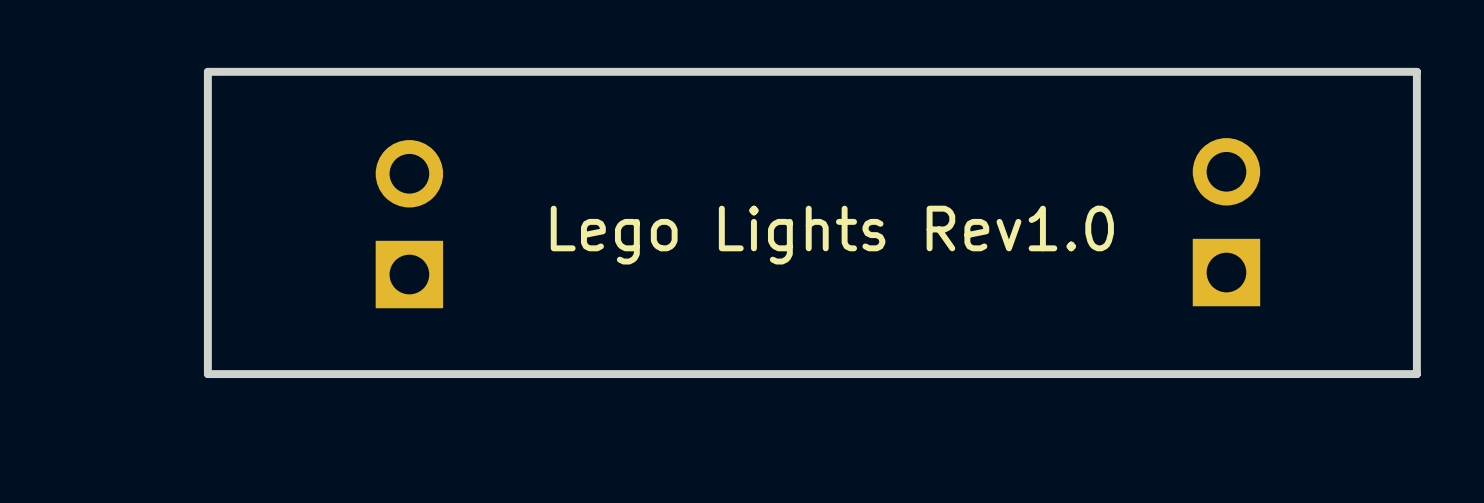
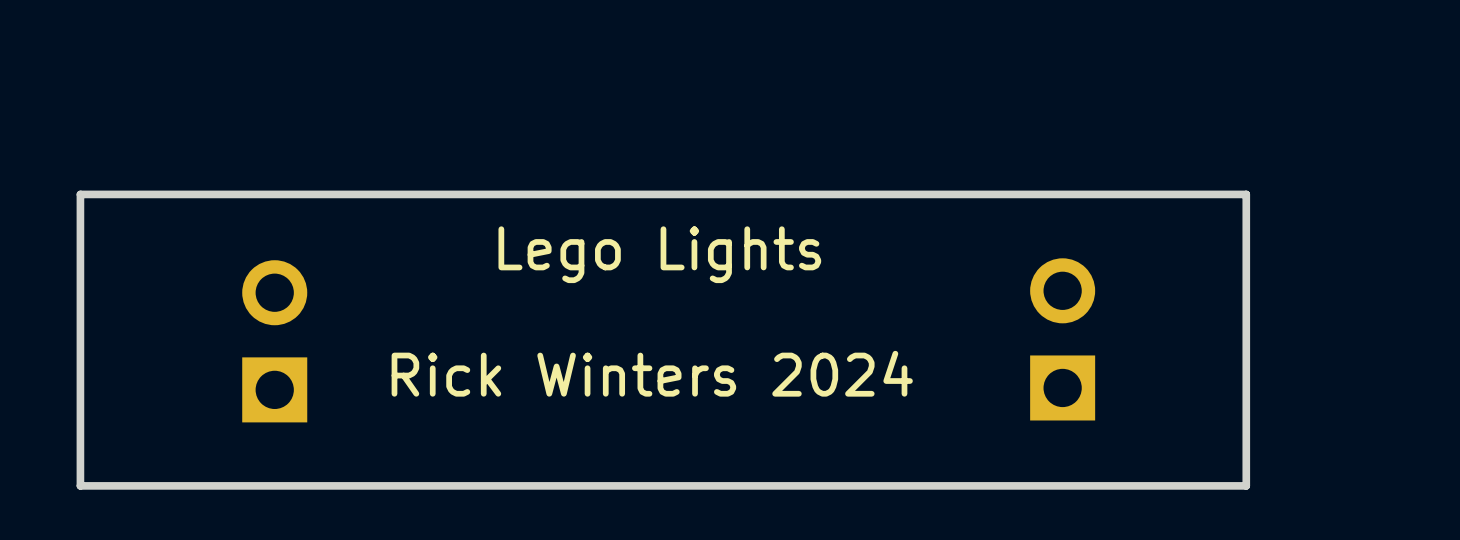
text: none -> Lego Lights (659, 254)
text: Lego Lights Rev1.0 (832, 235) -> Rick Winters 2024 (652, 373)

